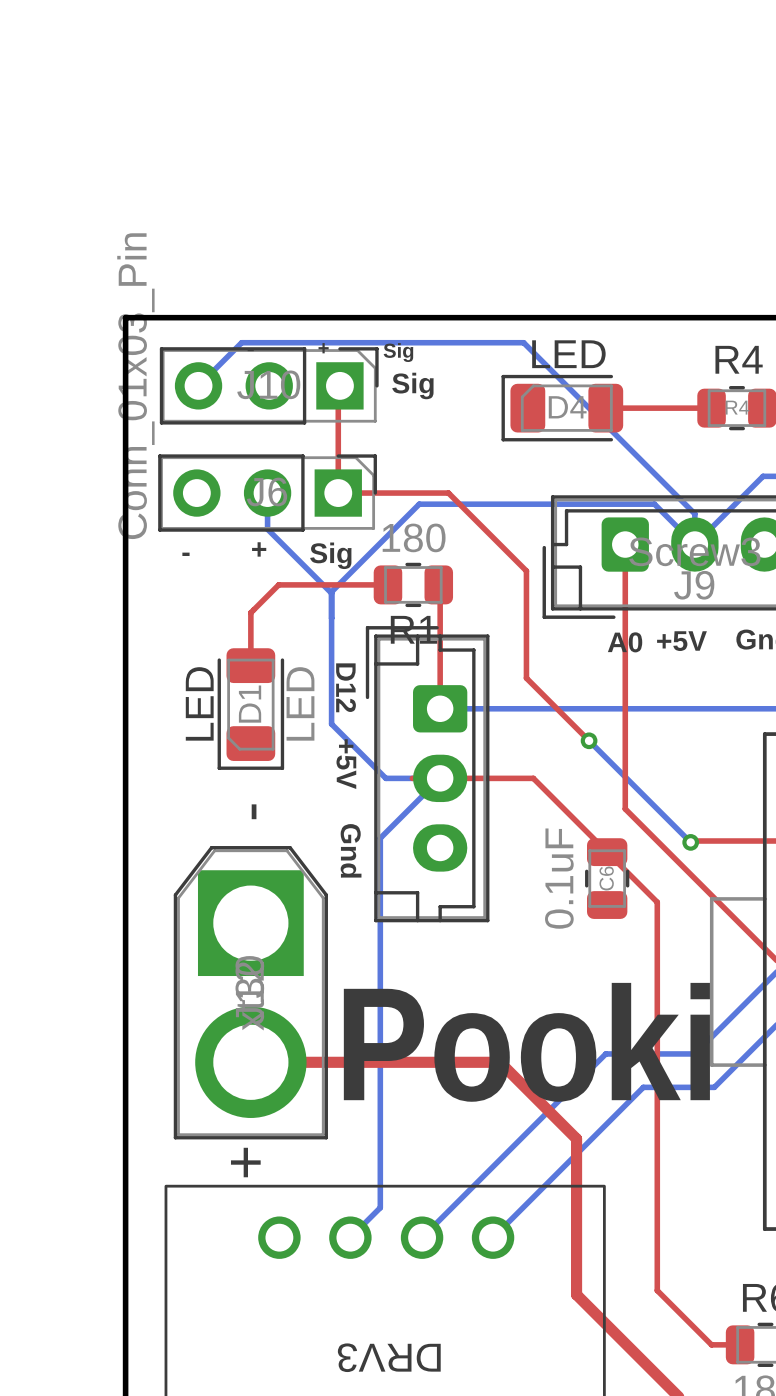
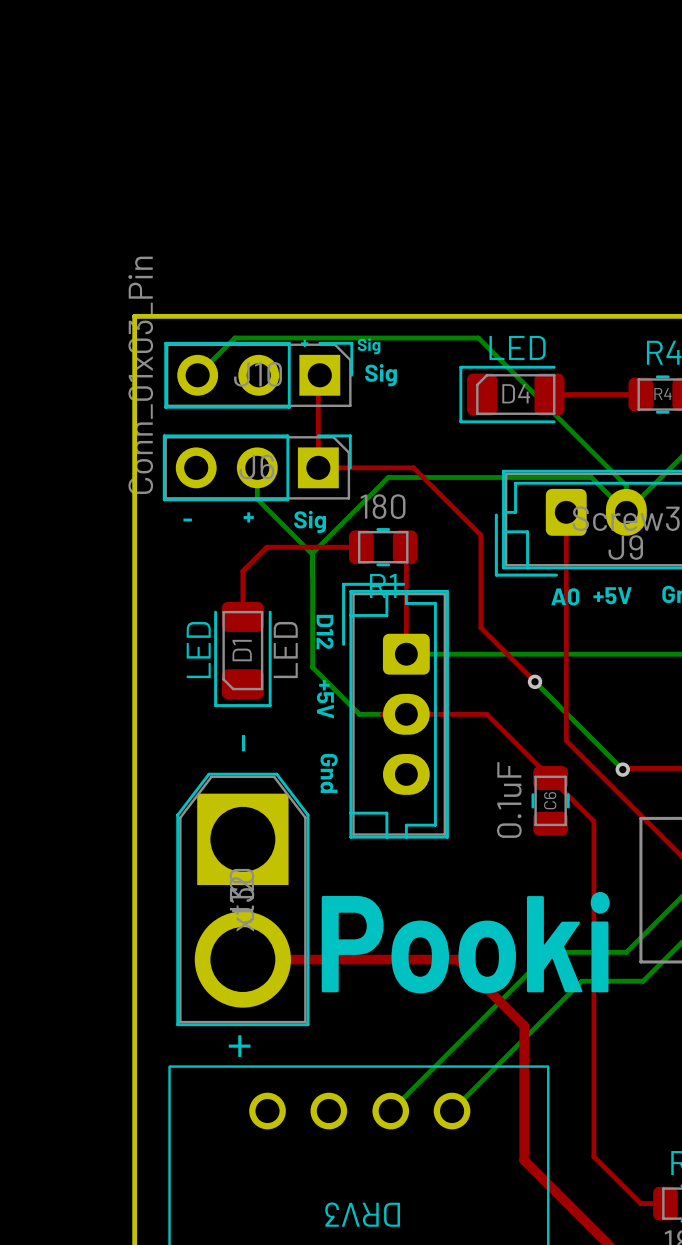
bottom track: (440, 778) (380, 838) (380, 1207) (350, 1237) -> none

